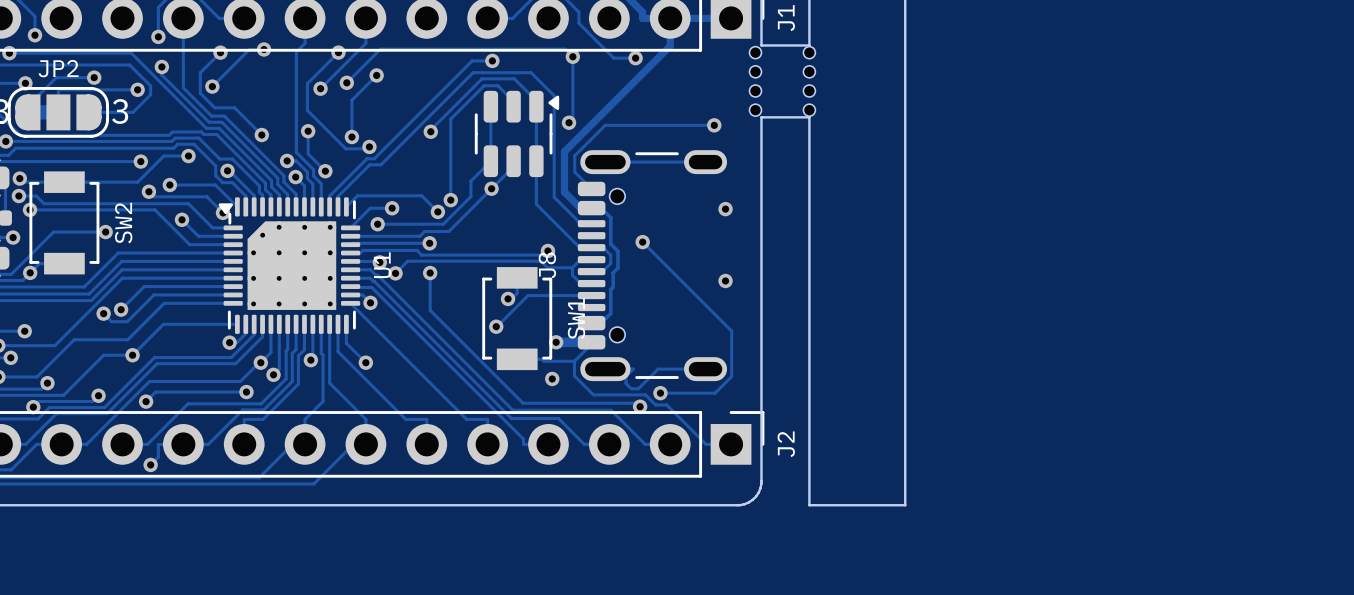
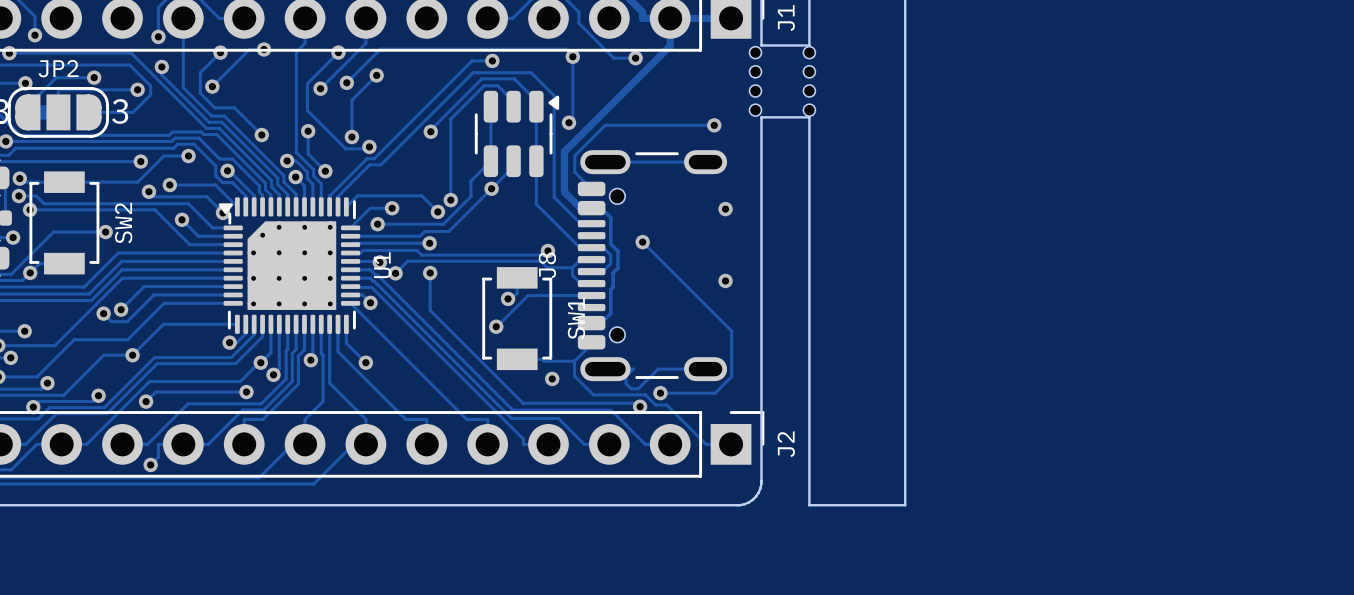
track: (556, 342) (584, 342) -> none
via: (556, 342) -> none

